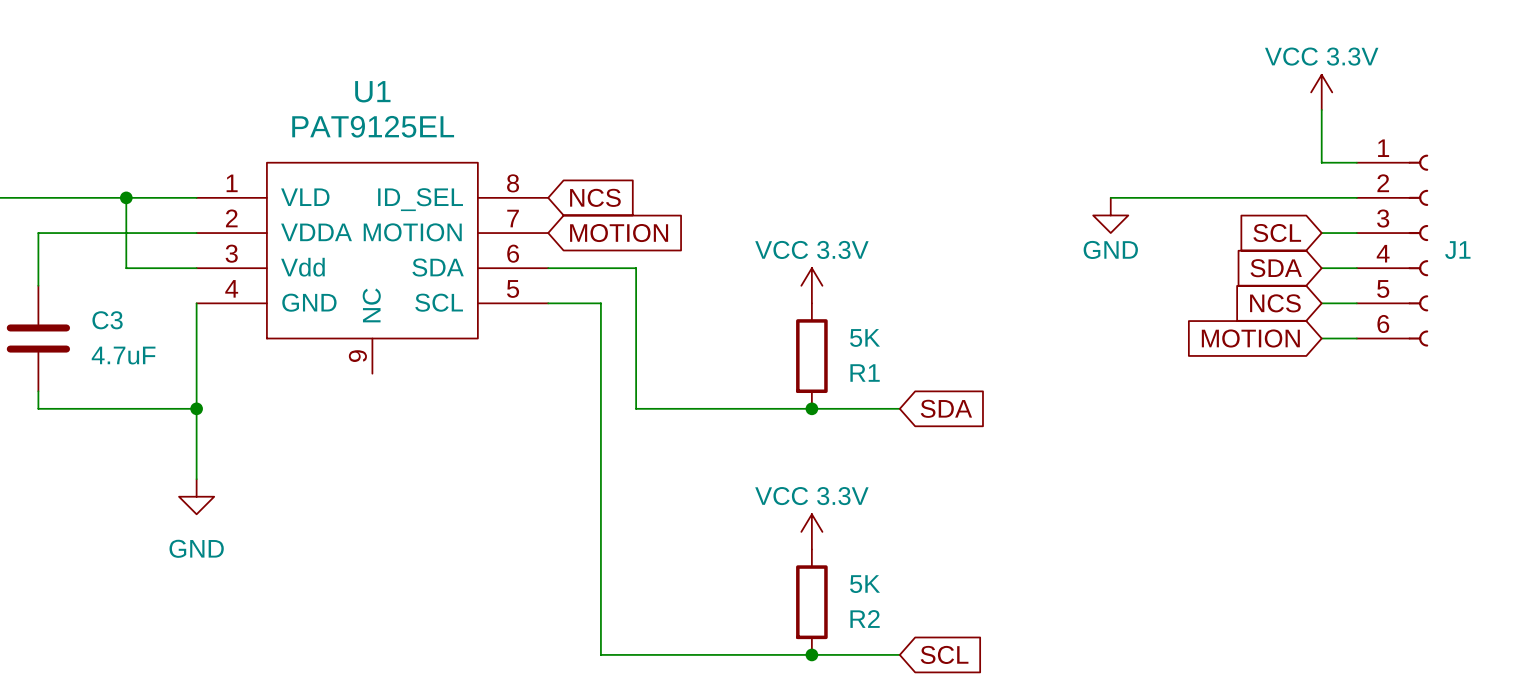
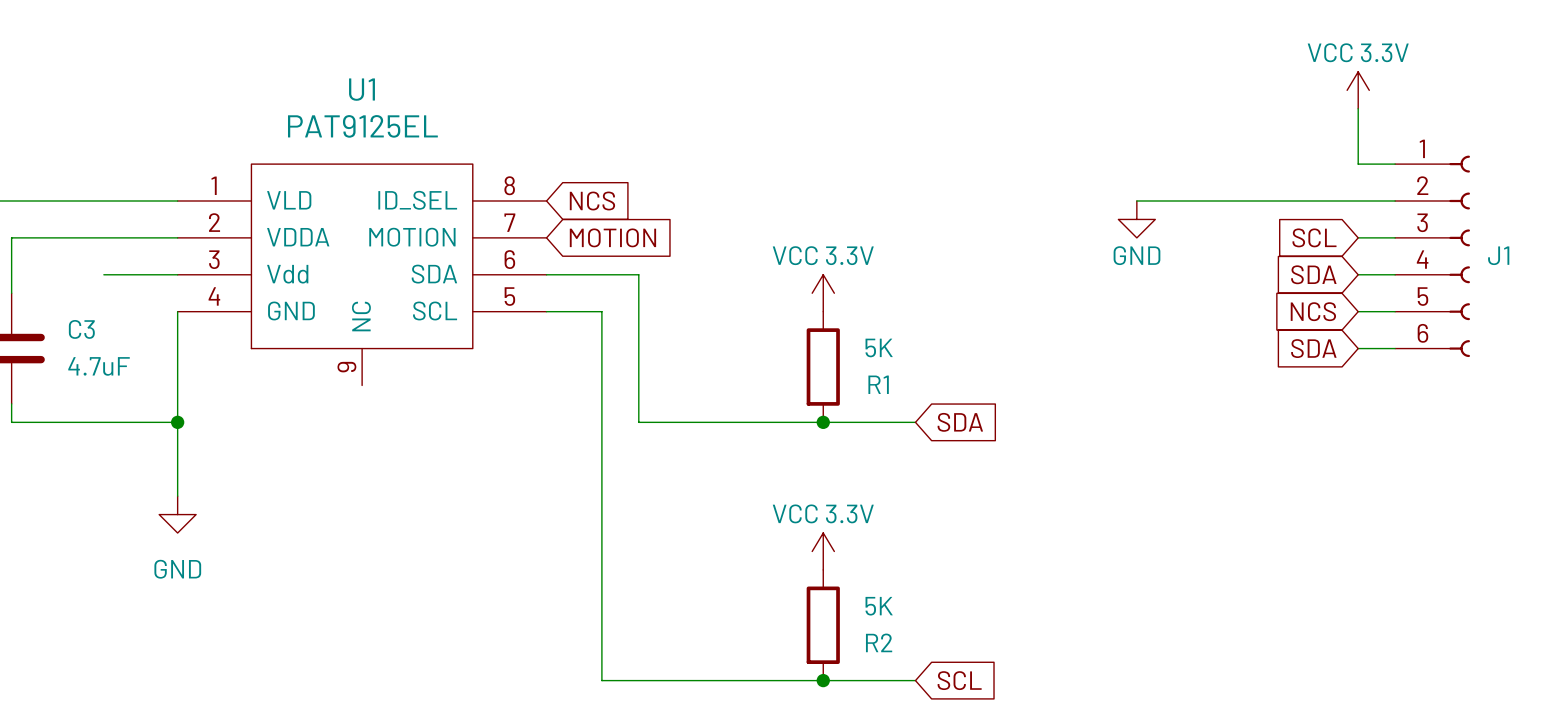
wire: (126, 197) (126, 268) -> none
junction: (126, 197) -> none
global label: MOTION (1250, 338) -> SDA (1313, 348)

